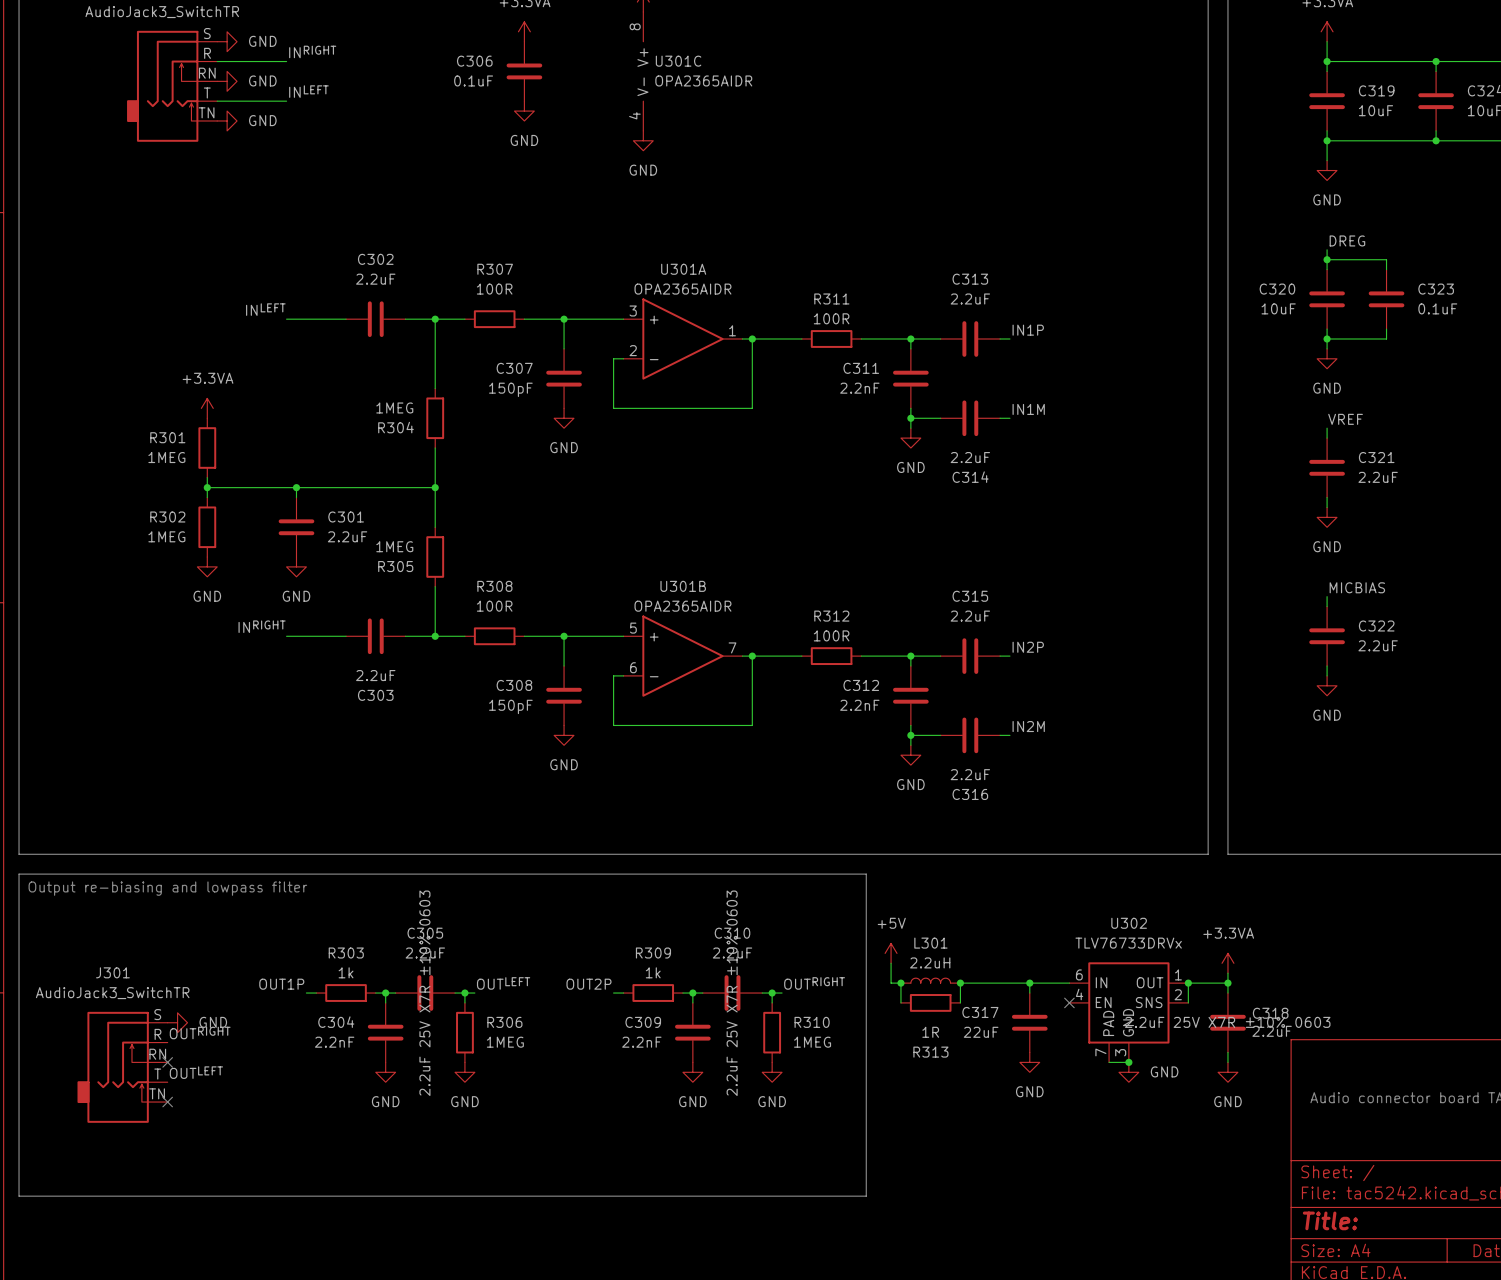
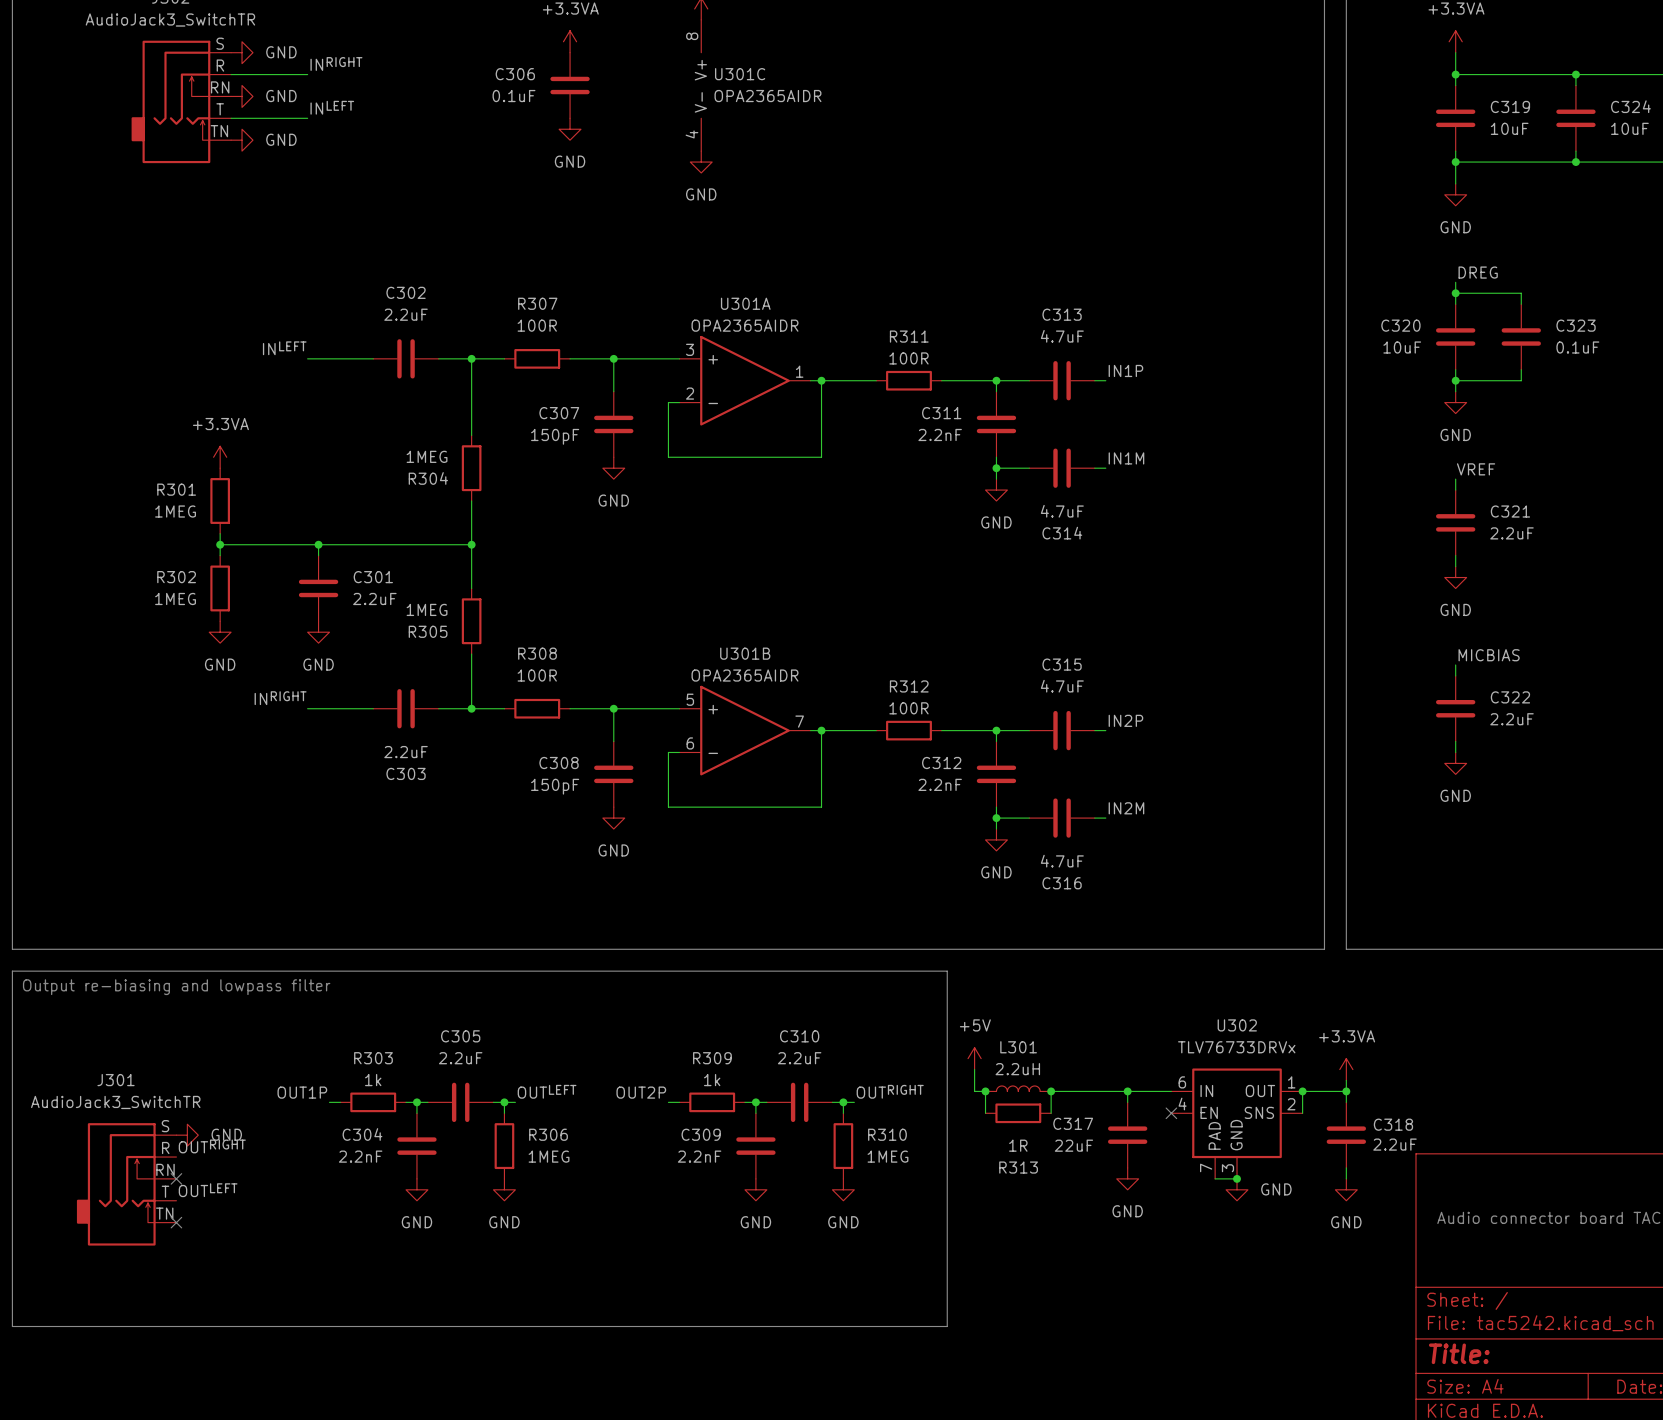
C313 value: 2.2uF (970, 298) -> 4.7uF (1062, 336)
C314 value: 2.2uF (970, 457) -> 4.7uF (1062, 511)
C315 value: 2.2uF (970, 616) -> 4.7uF (1062, 686)
C316 value: 2.2uF (970, 774) -> 4.7uF (1062, 861)
C305 text: 2.2uF 25V X7R ±10% 0603 (424, 993) -> none
C310 text: 2.2uF 25V X7R ±10% 0603 (732, 993) -> none
C318 text: 2.2uF 25V X7R ±10% 0603 (1227, 1022) -> none

